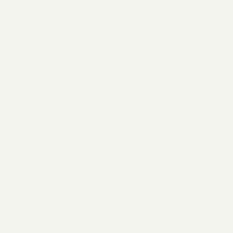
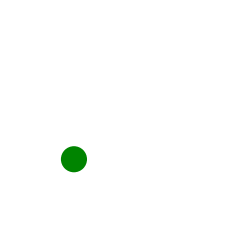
junction: none -> (73, 159)

